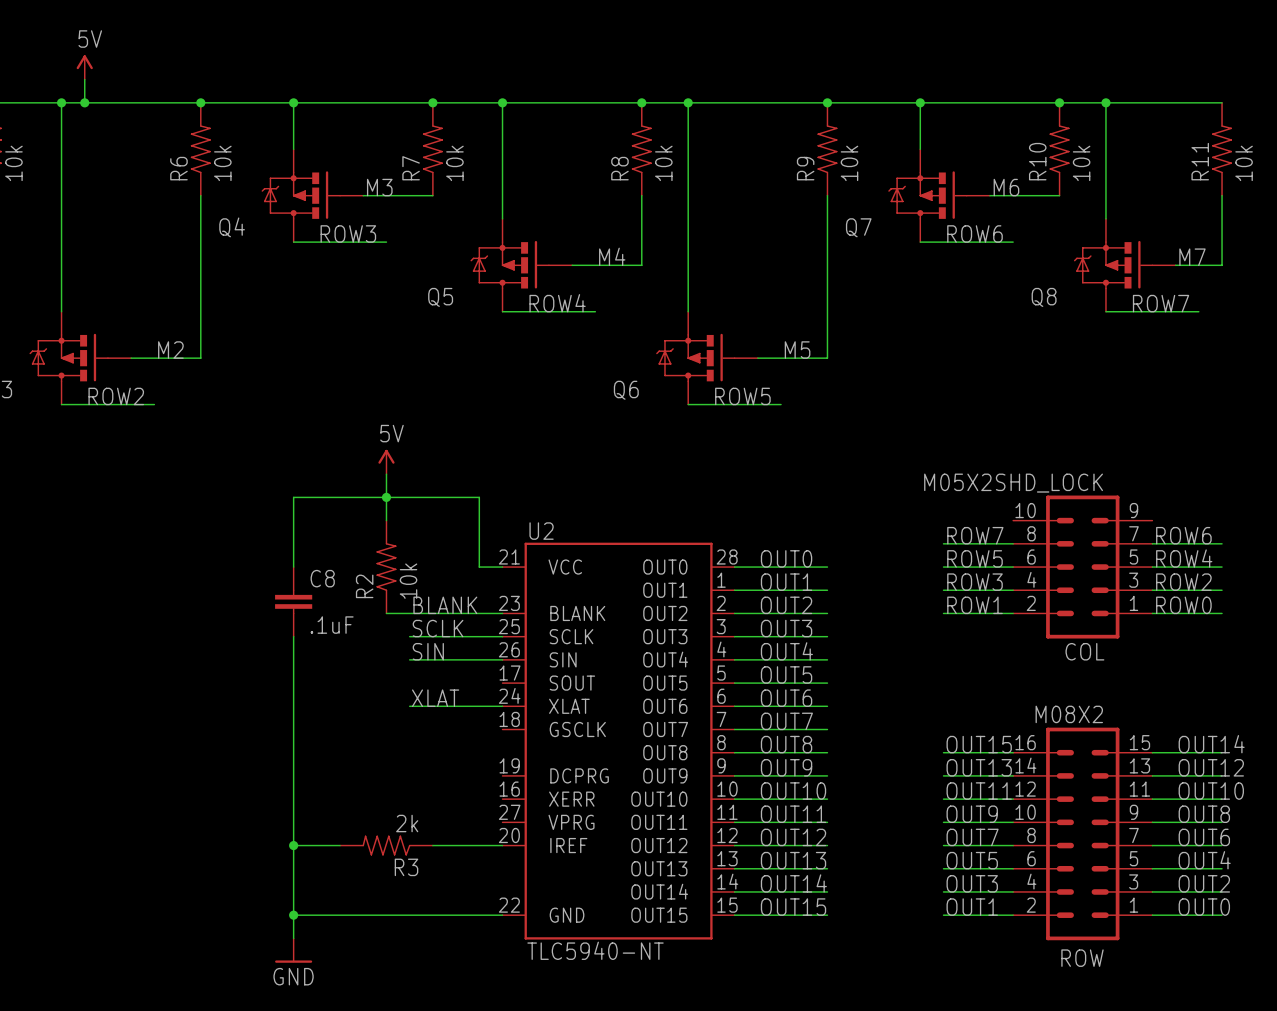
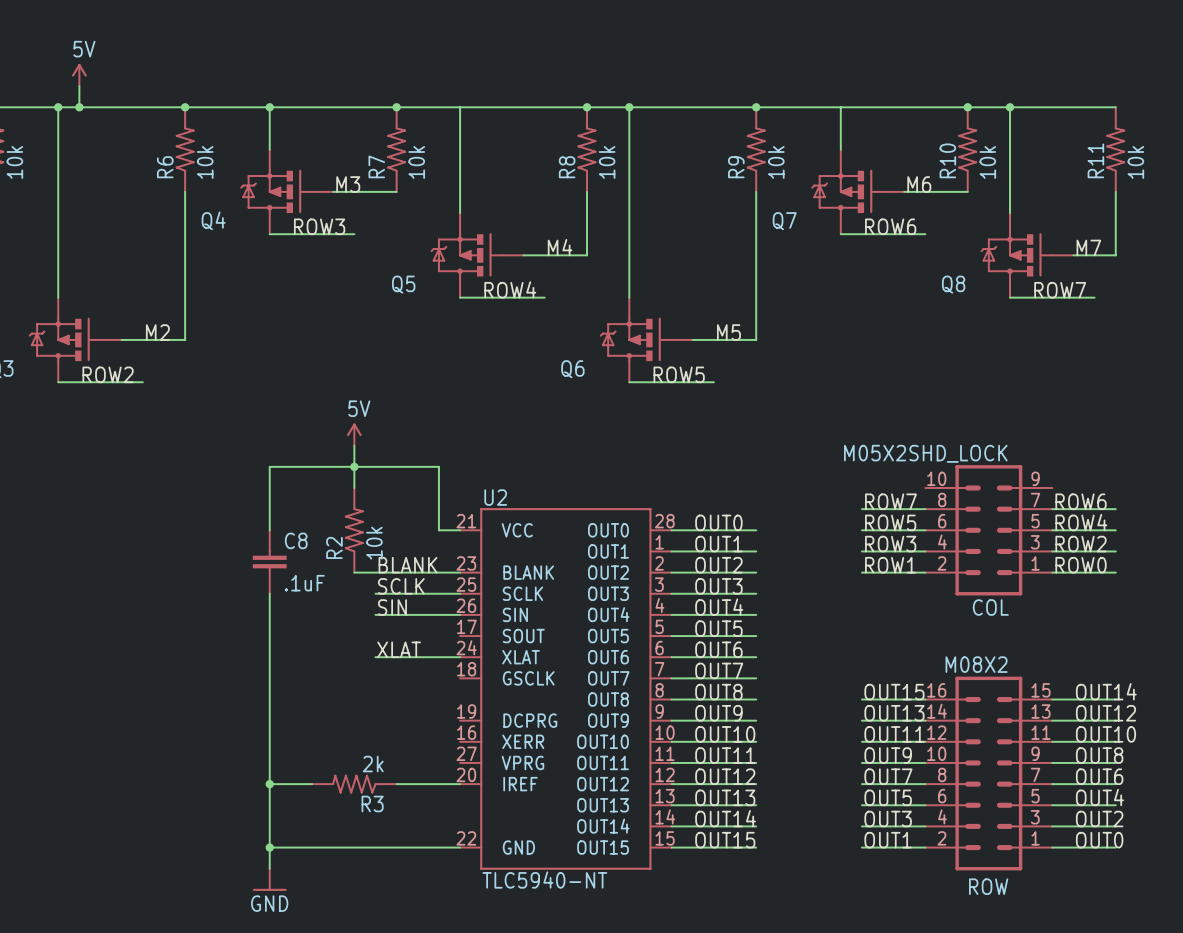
junction: (502, 102) -> none
junction: (920, 102) -> none

